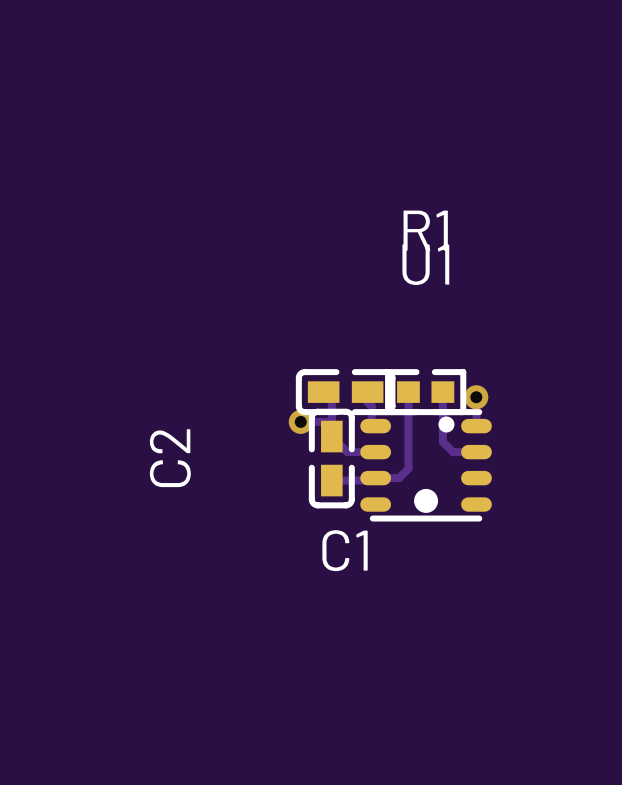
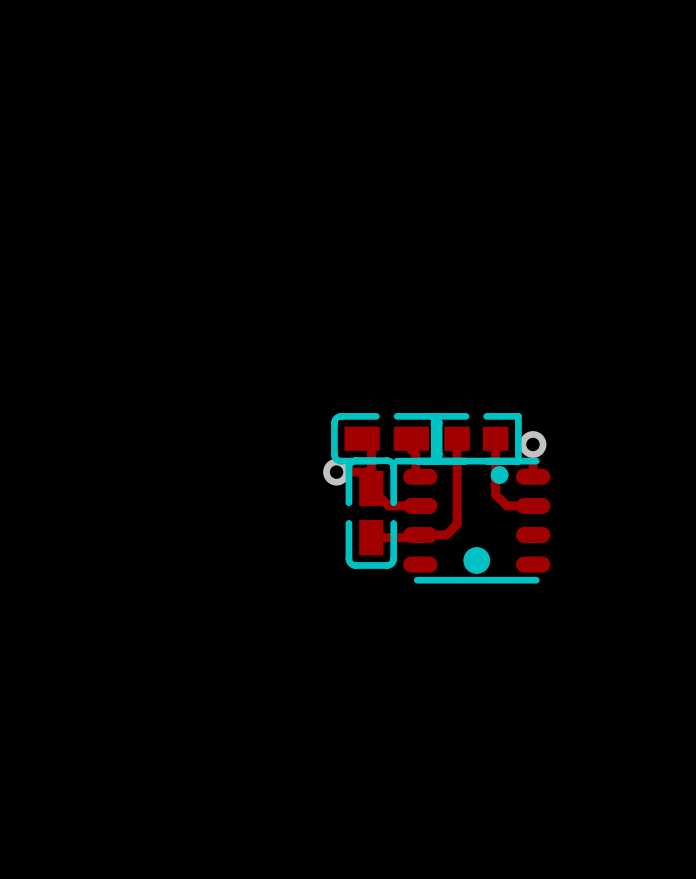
R1 name: R1 (425, 230) -> none
U1 name: U1 (425, 264) -> none
C2 name: C2 (170, 458) -> none
C1 name: C1 (345, 550) -> none

